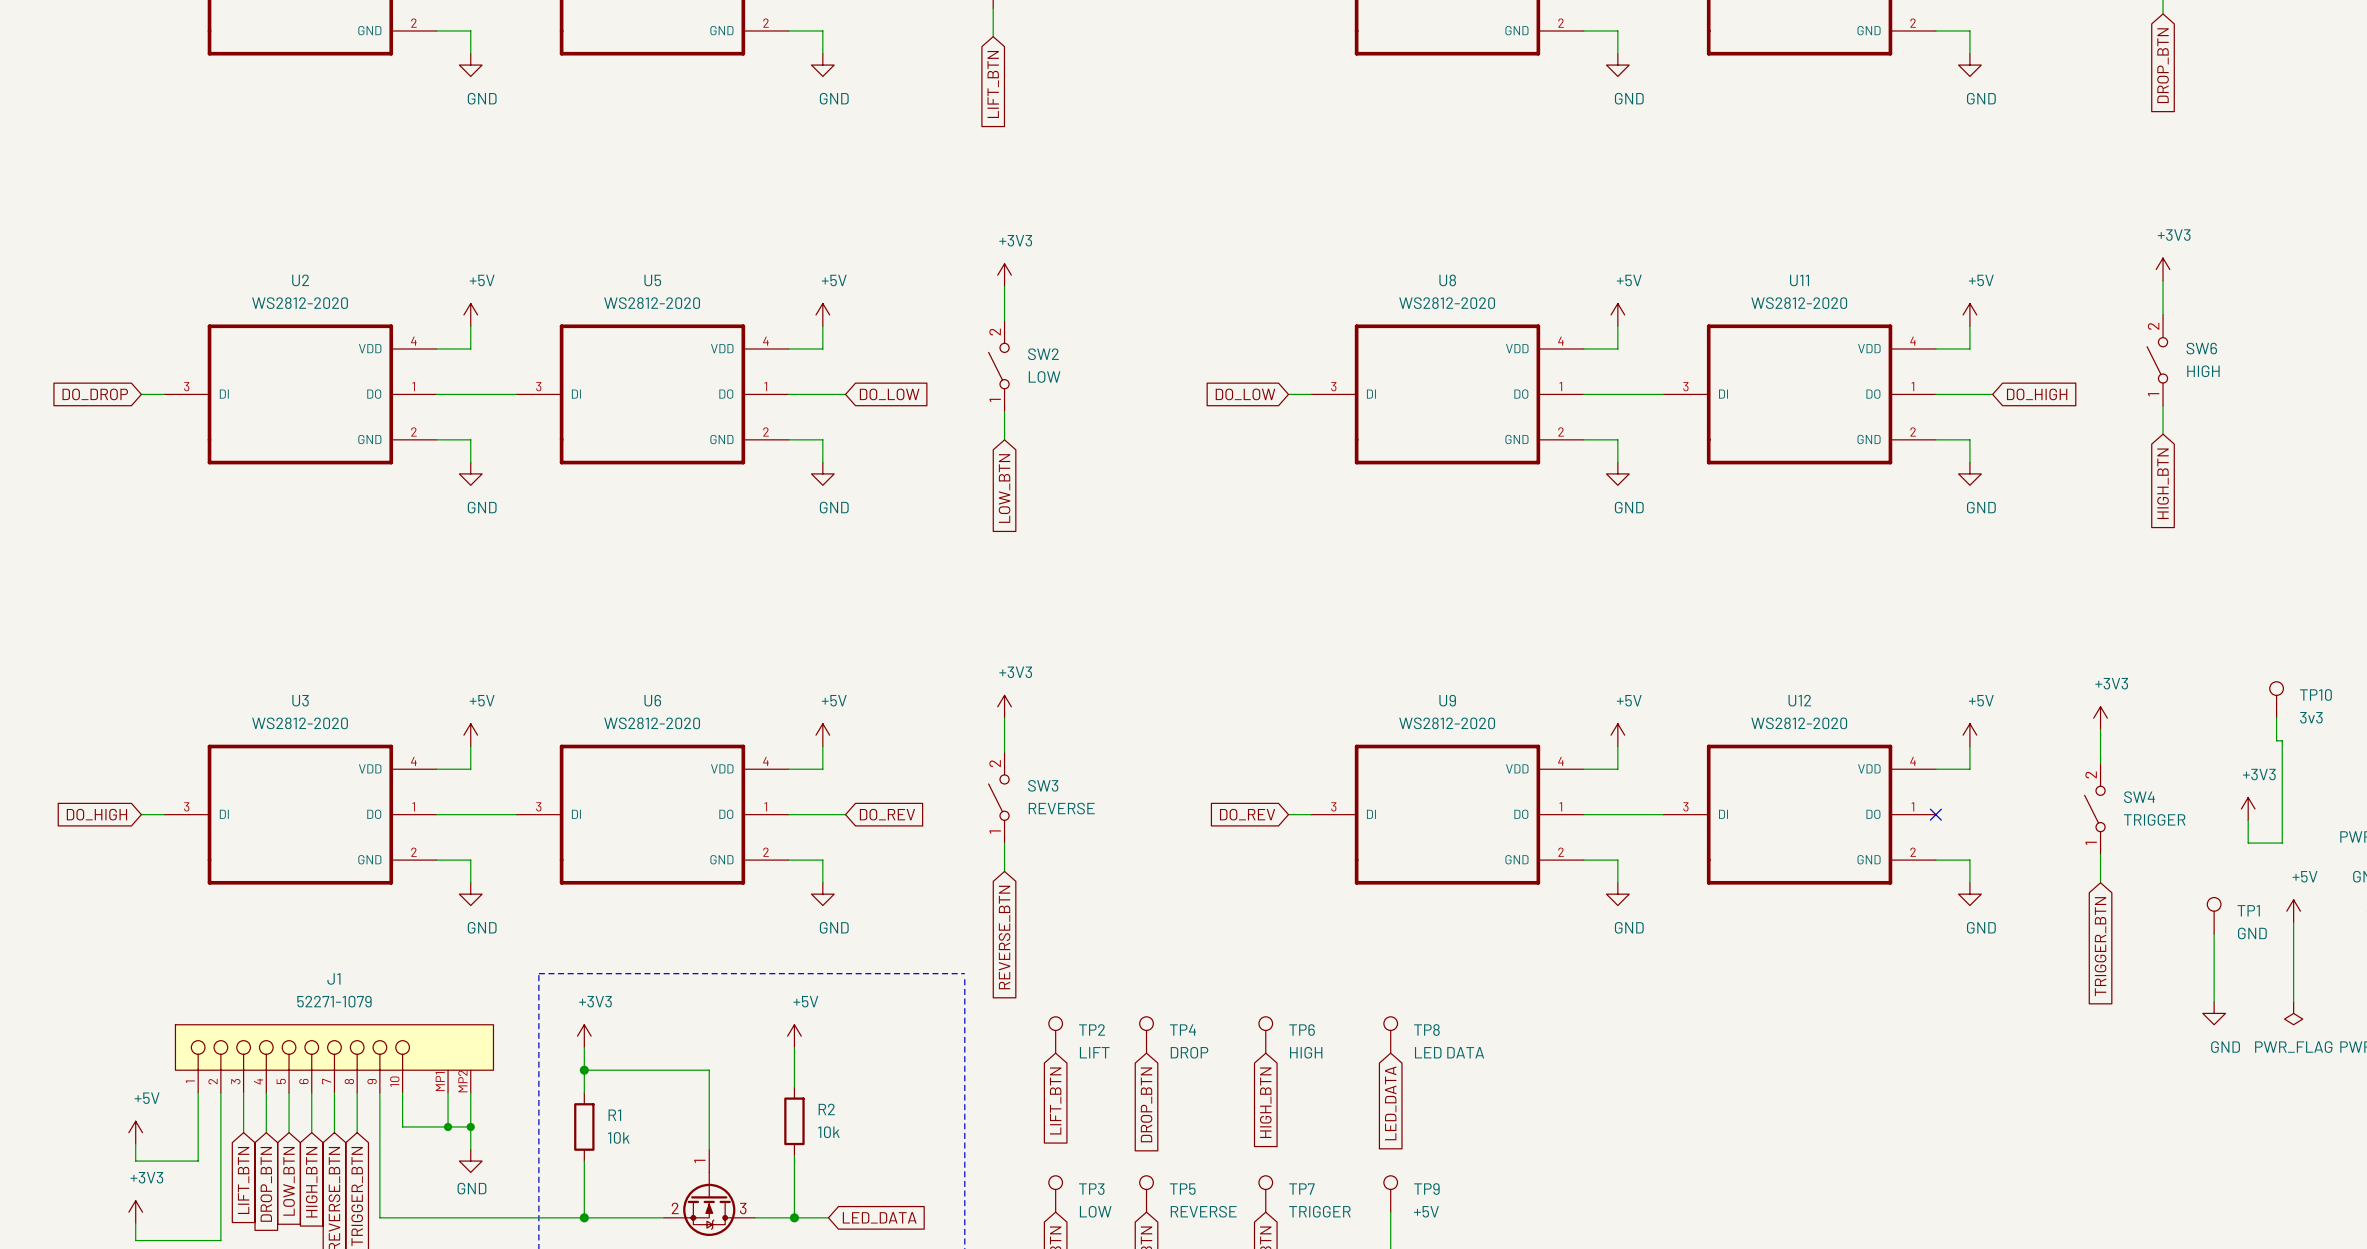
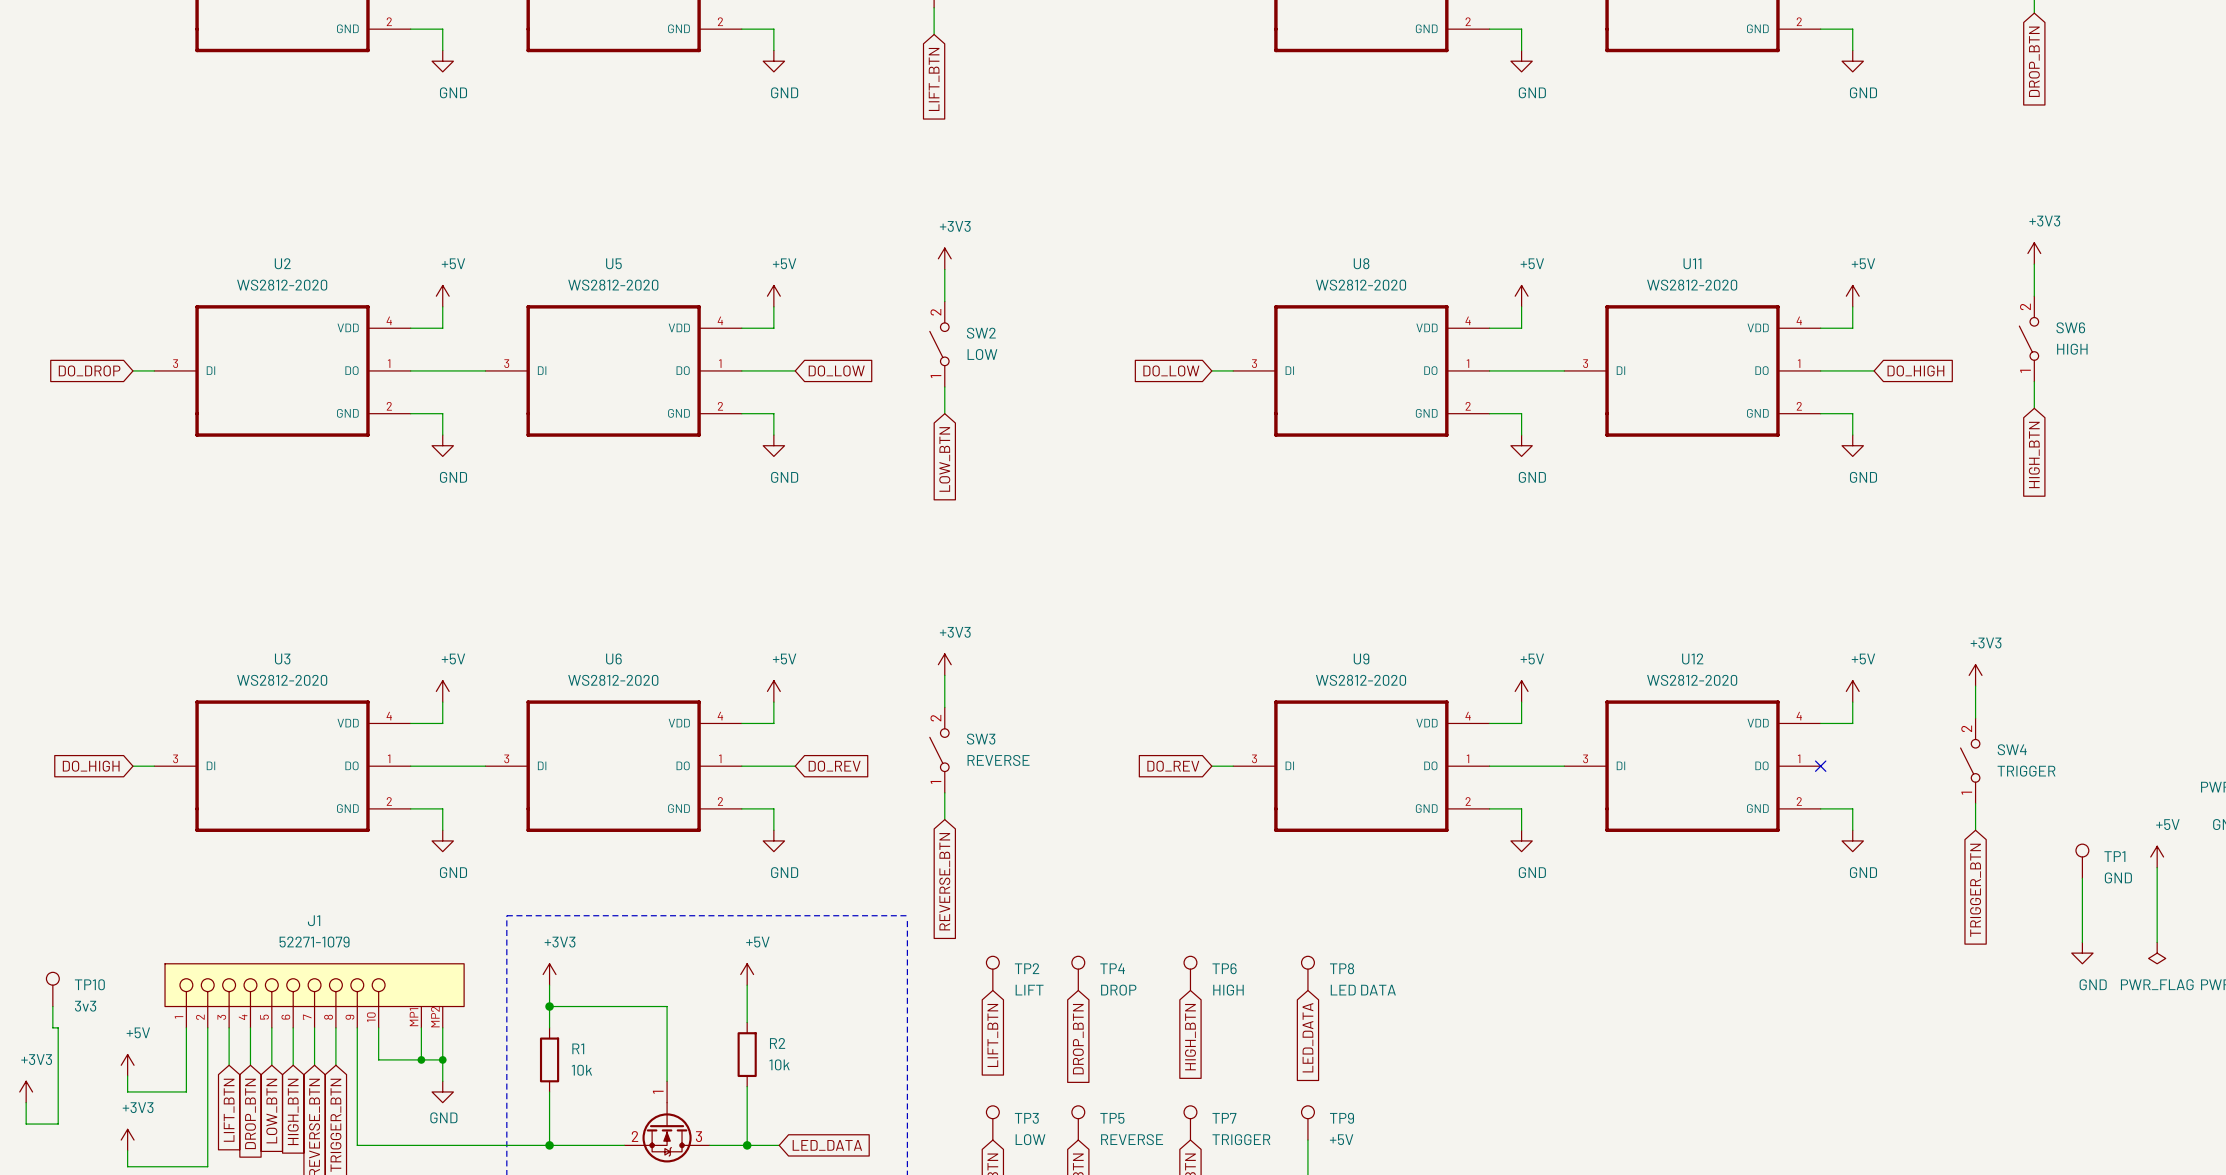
TP10 position: (2276, 699) -> (52, 989)
wire: (2276, 718) (2276, 740) (2282, 740) (2282, 843) (2248, 843) (2248, 820) -> none
power symbol: +3V3 (2248, 808) -> none
wire: none -> (52, 1006) (52, 1027) (58, 1027) (58, 1124) (26, 1124) (26, 1102)
power symbol: none -> +3V3 (26, 1091)

